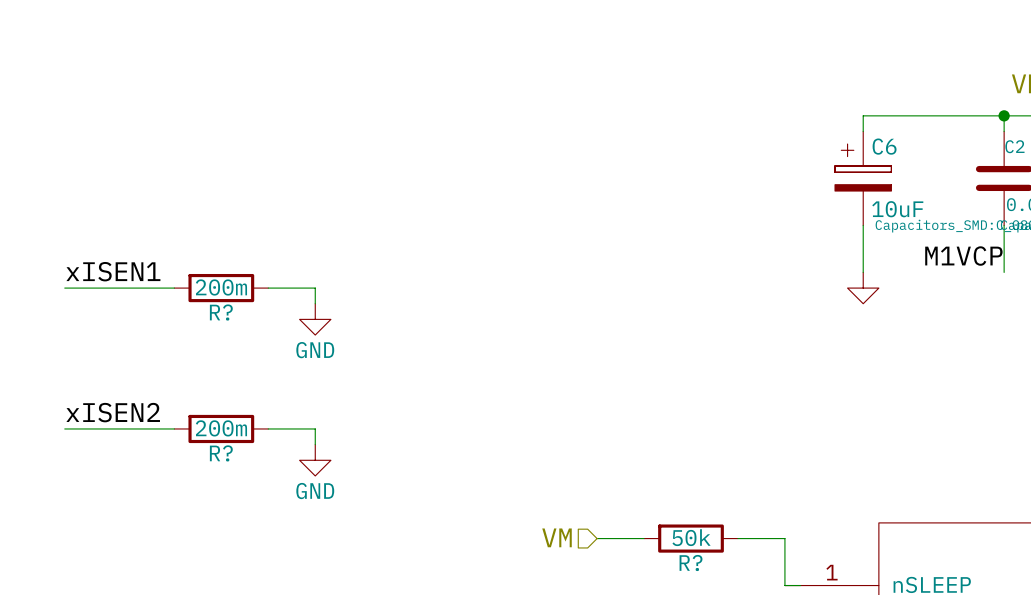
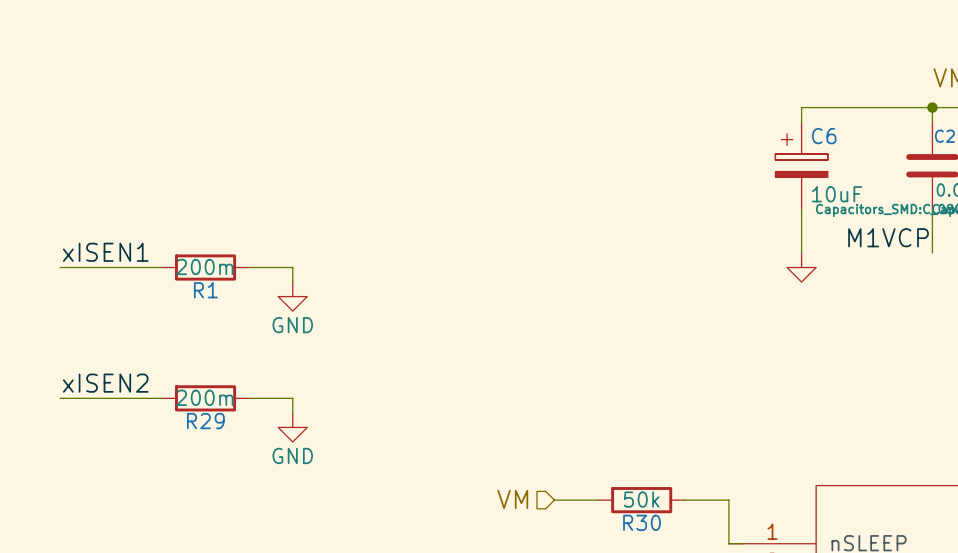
R? name: R? (221, 312) -> R1 (205, 290)
R? name: R? (221, 453) -> R29 (205, 421)
R? name: R? (691, 563) -> R30 (642, 522)

